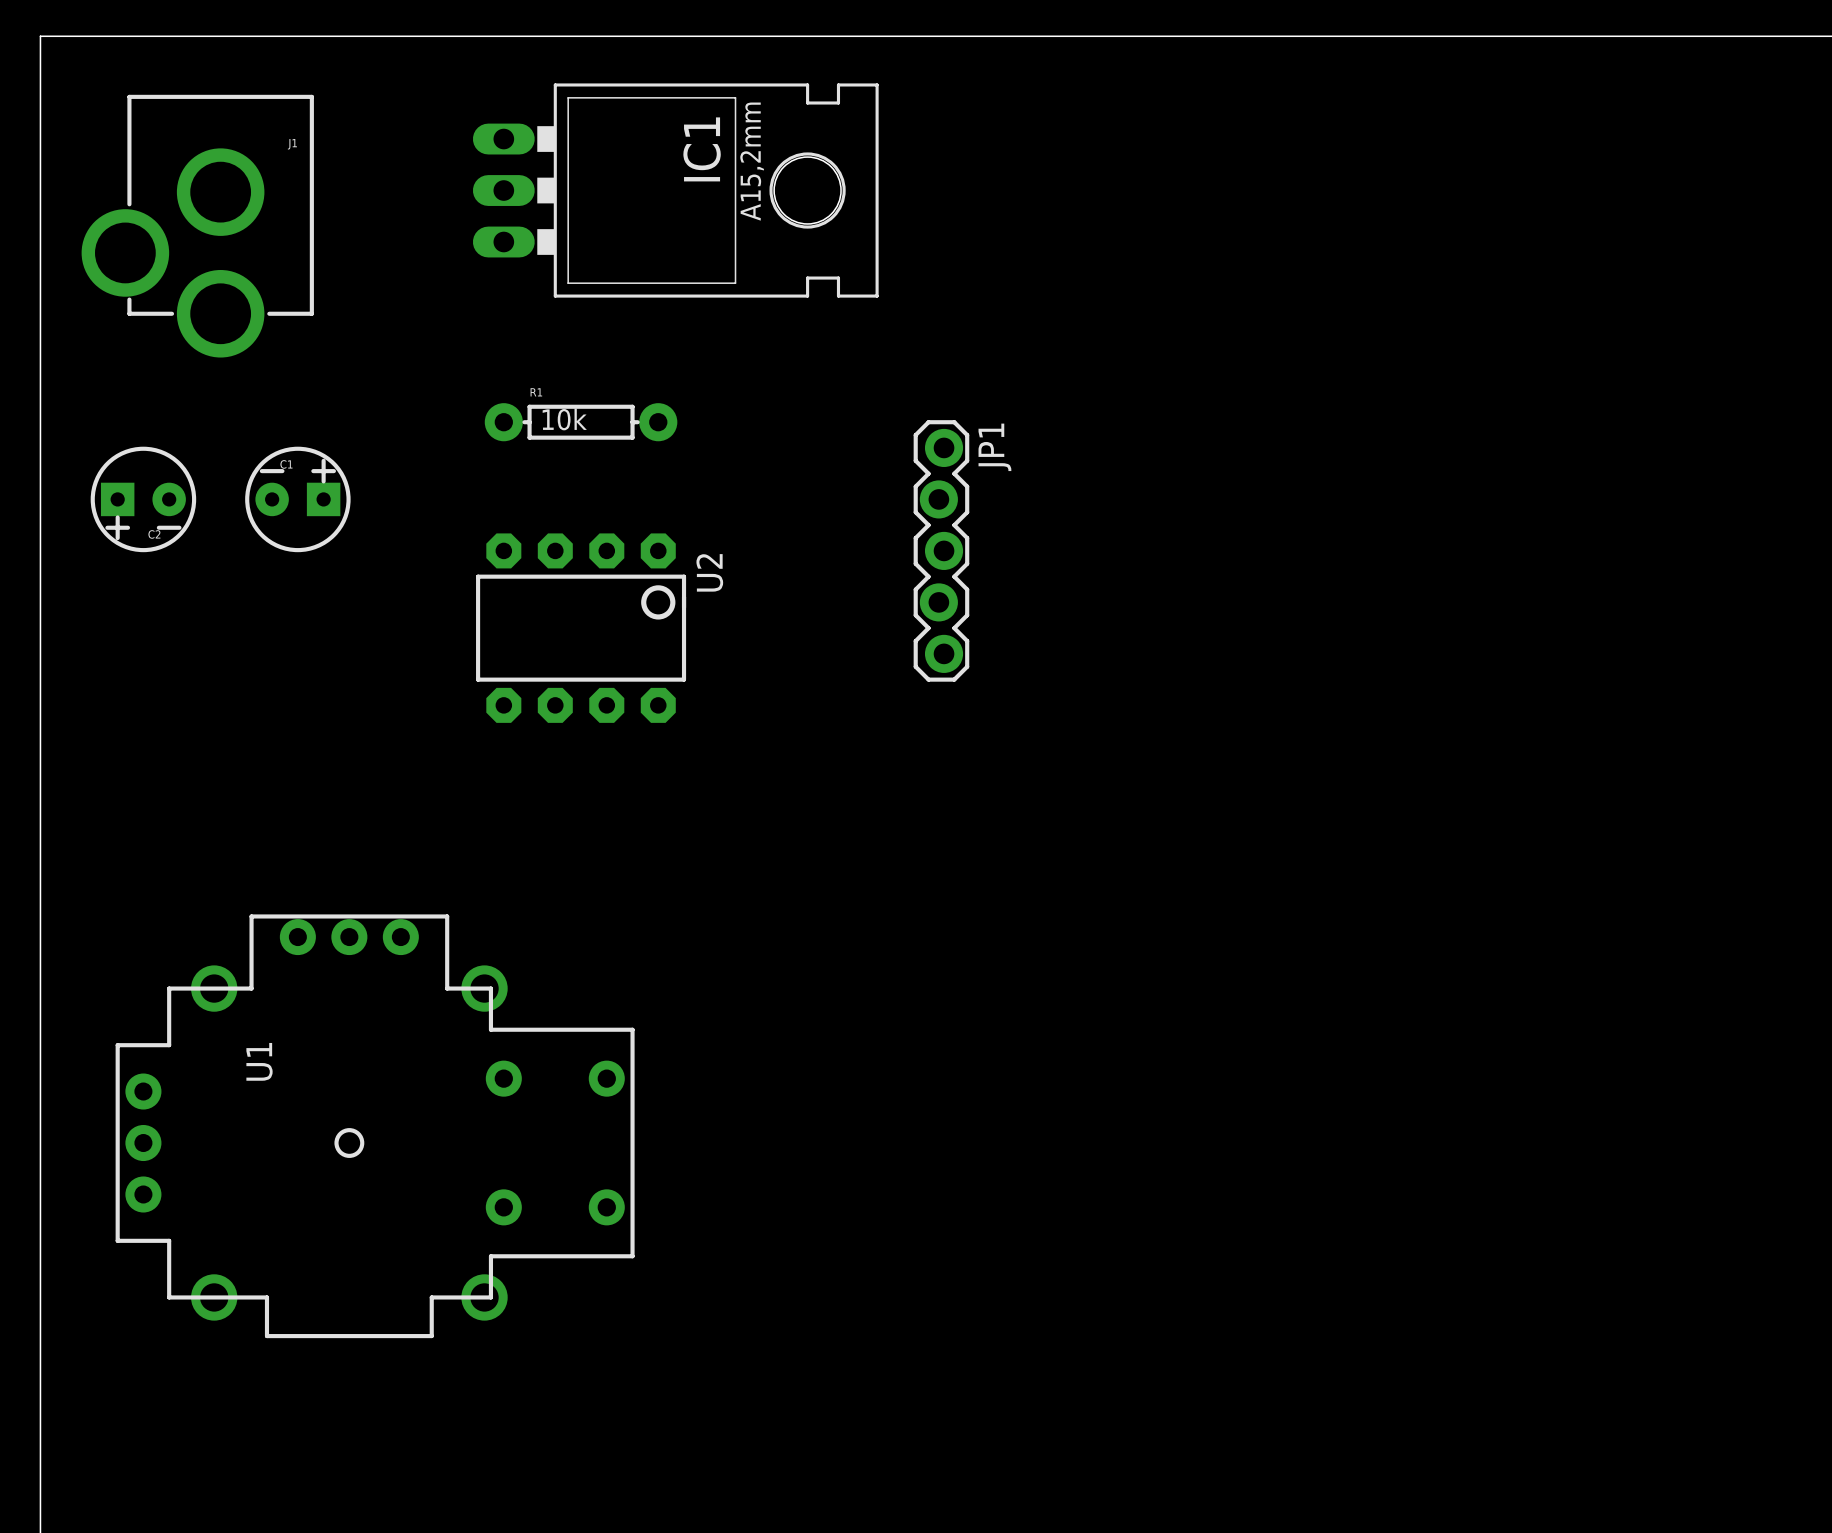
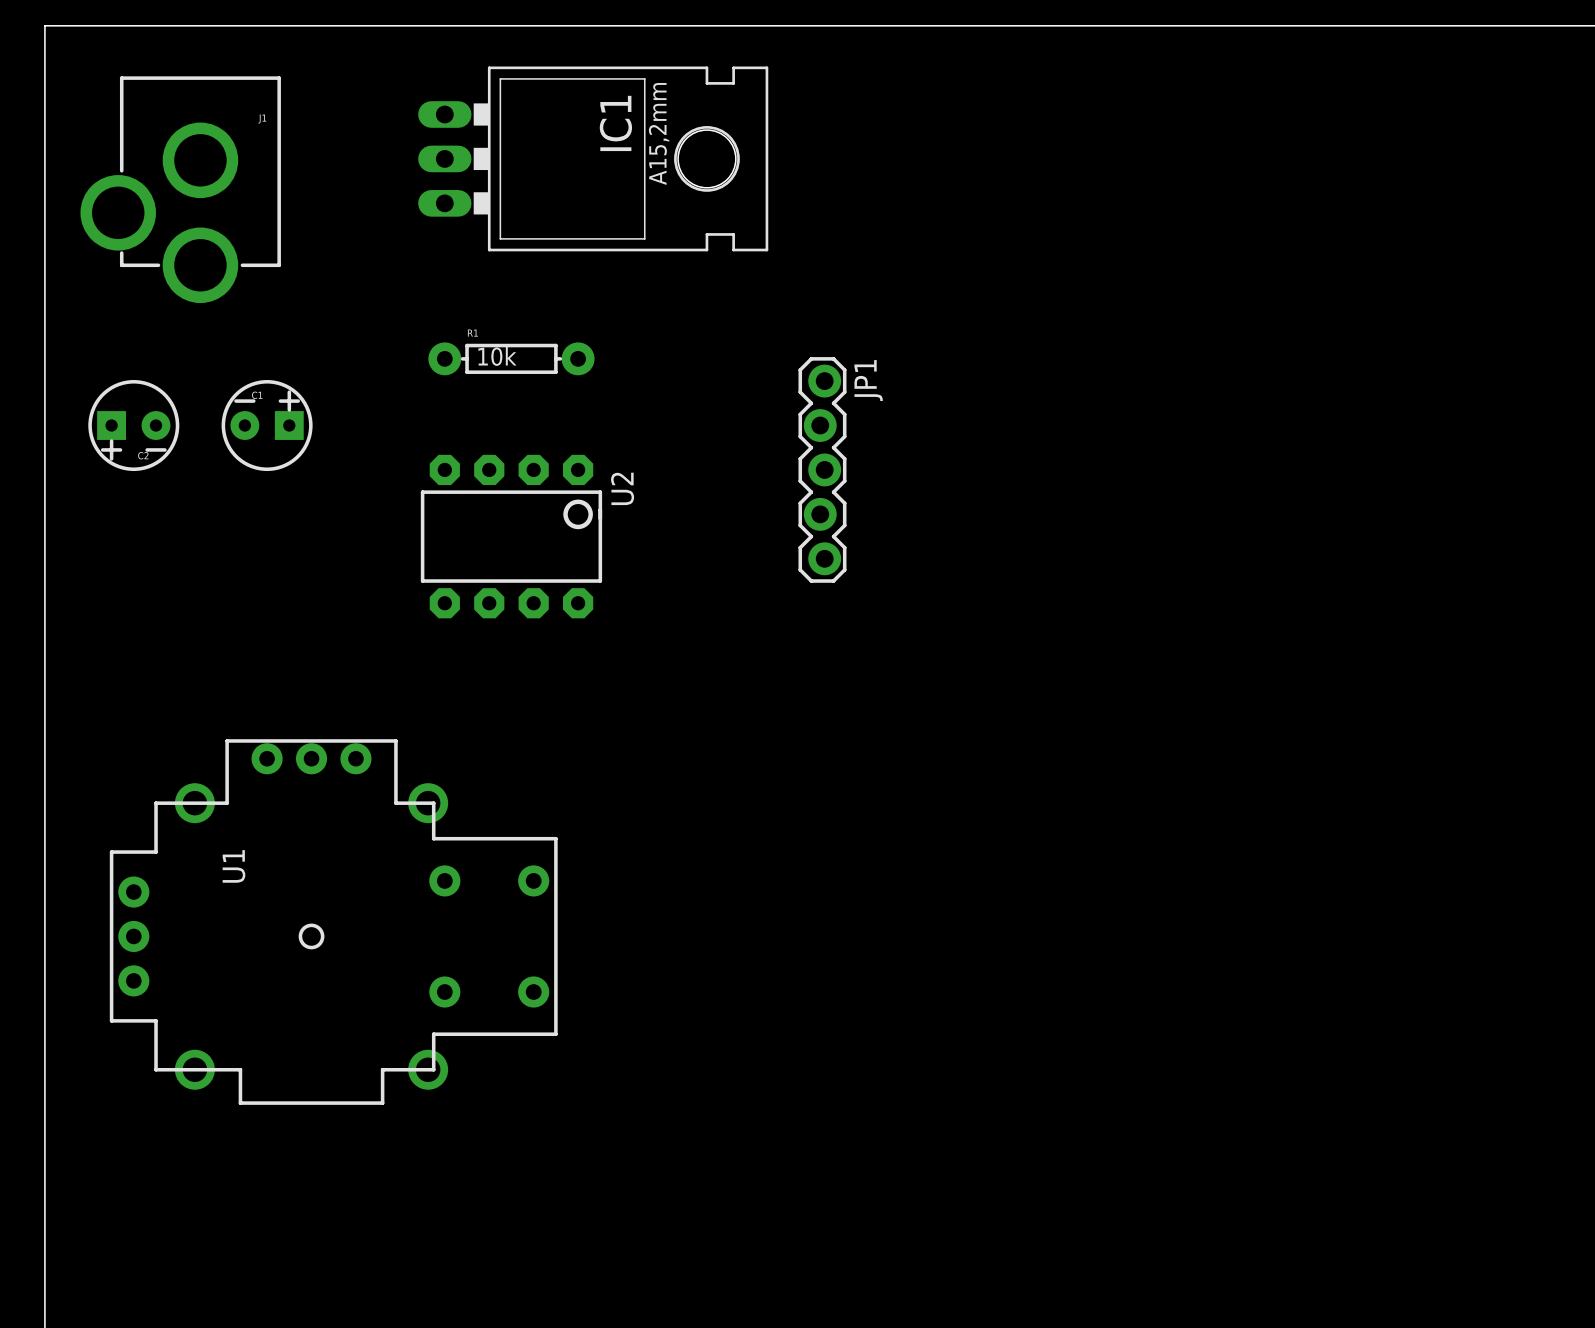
U1 position: (375, 1126) -> (333, 922)

